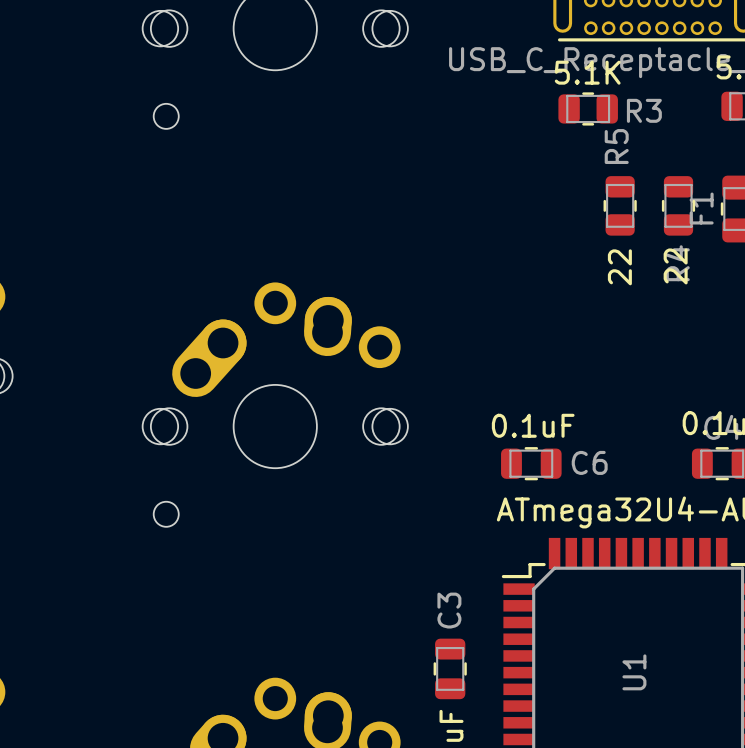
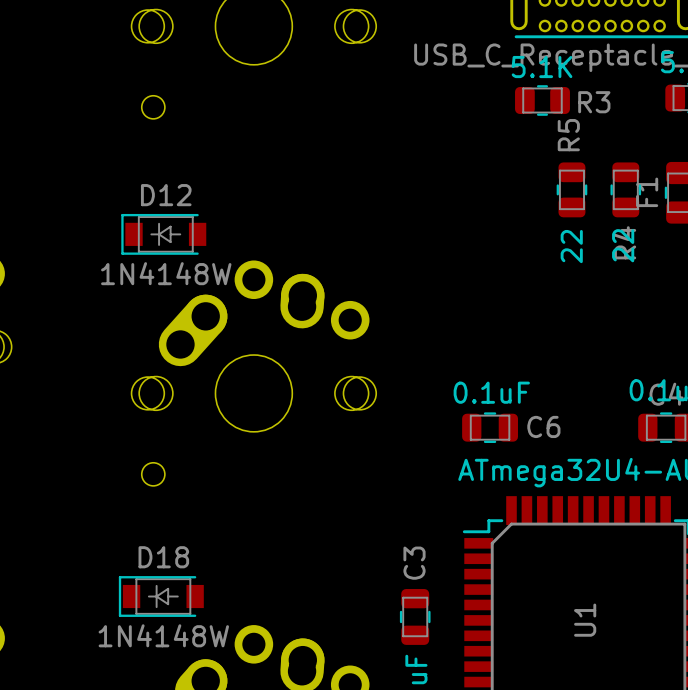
D12: none -> 1N4148W (163, 234)
D18: none -> 1N4148W (161, 596)

